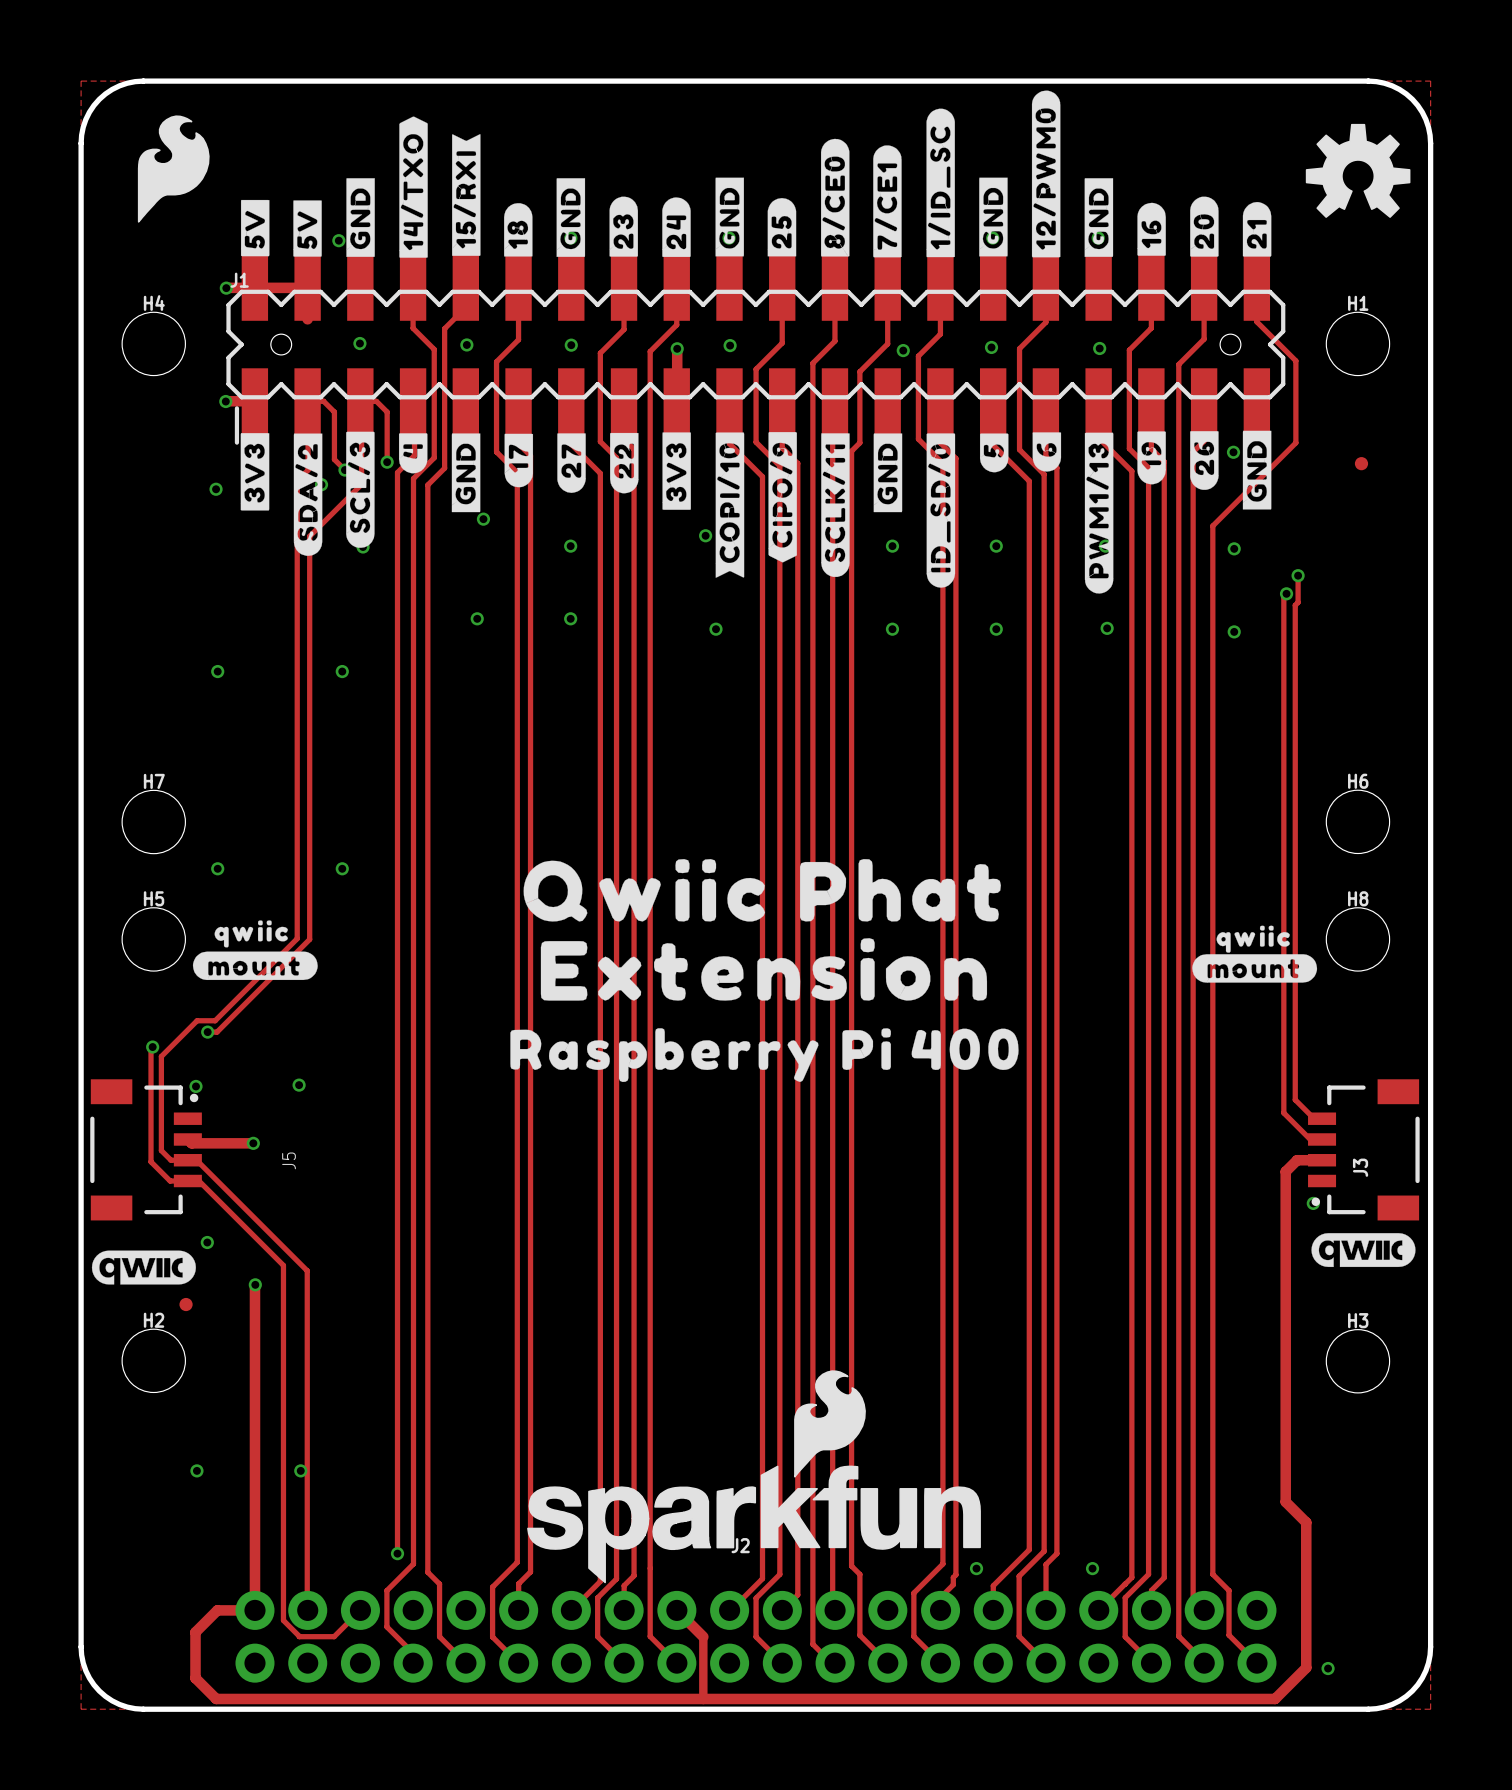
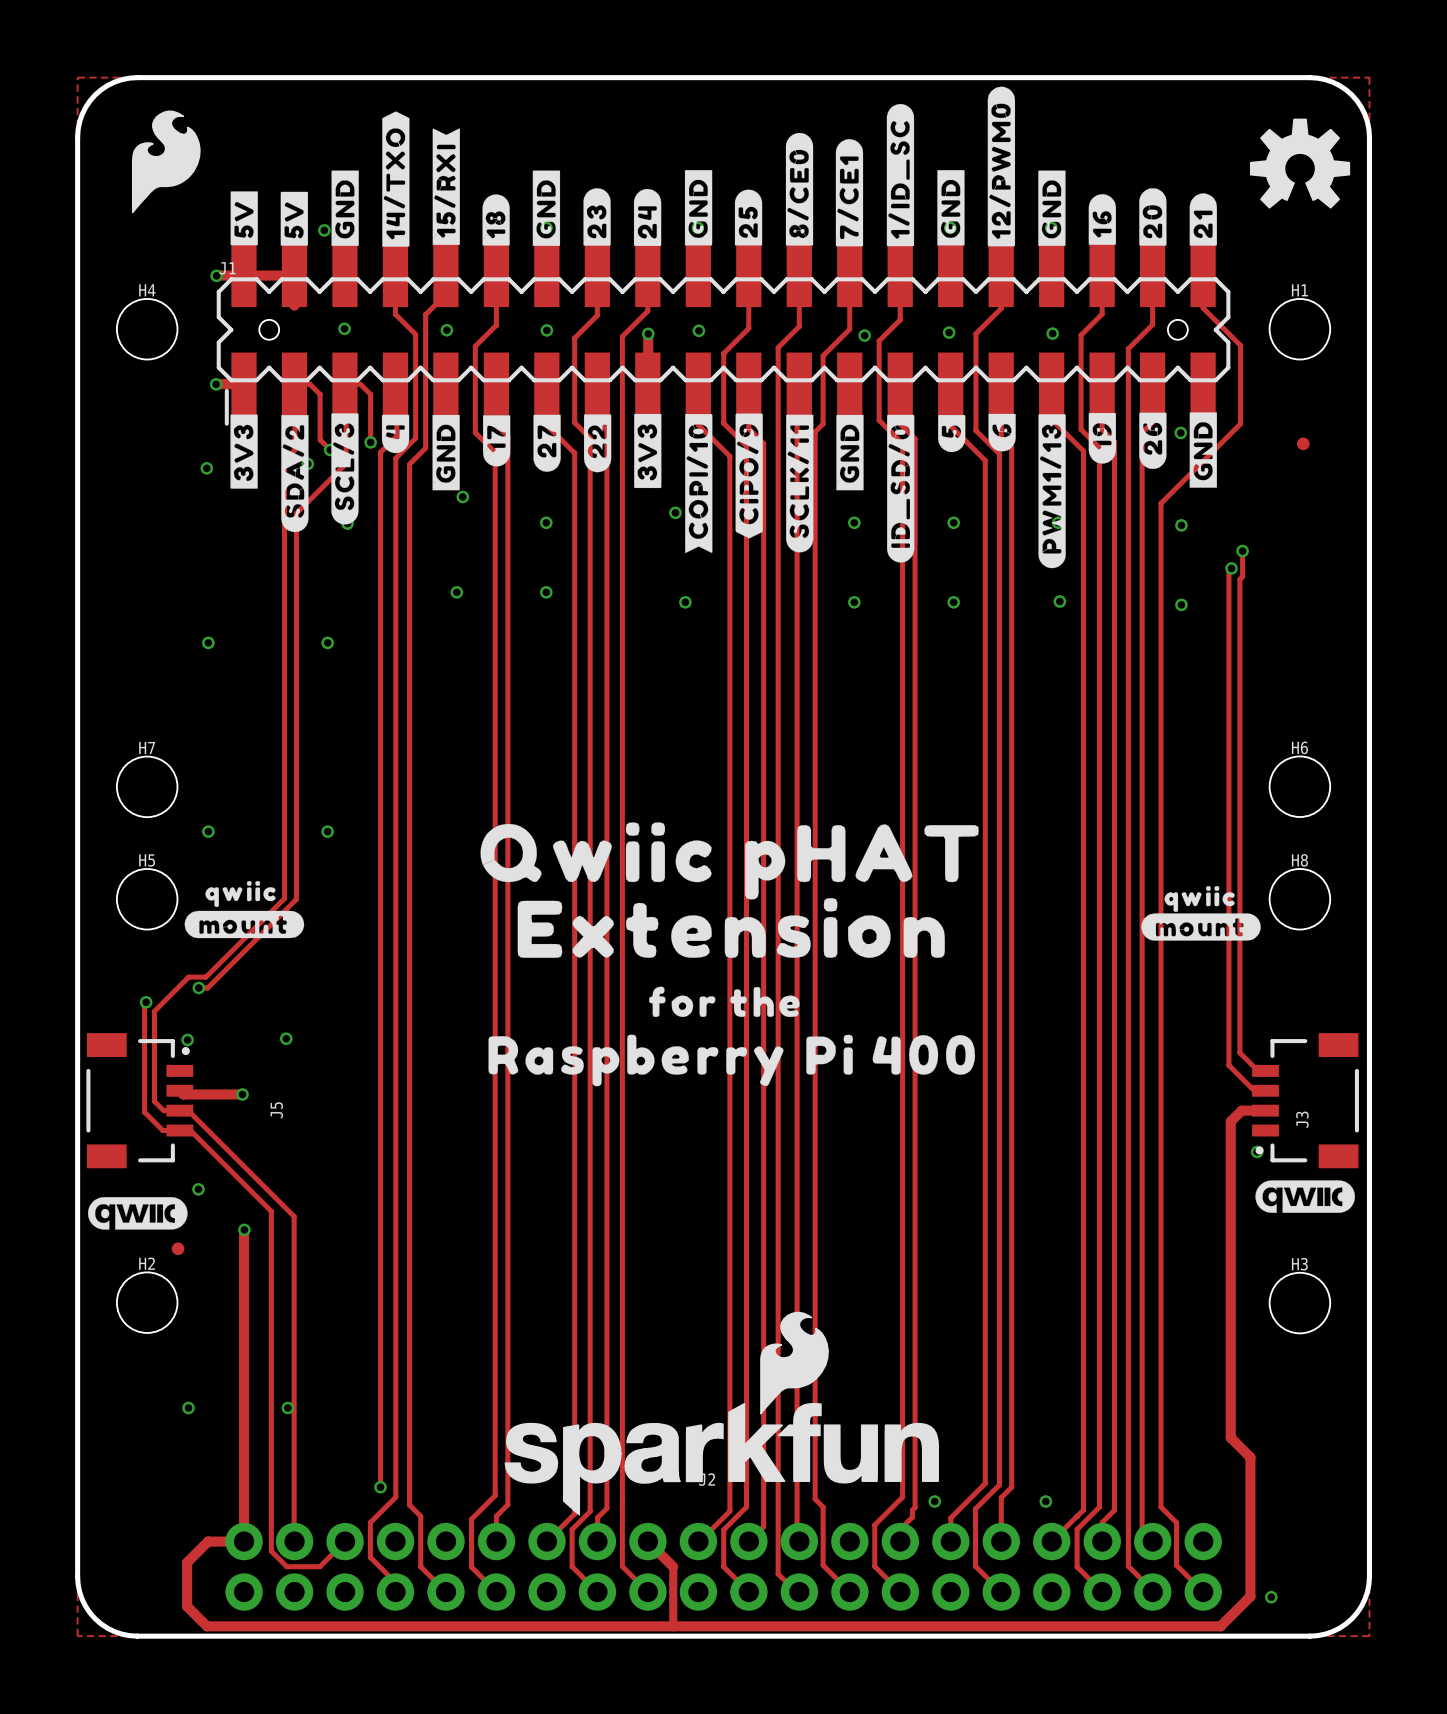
drawing shape: [523, 859, 1001, 922] -> [480, 822, 979, 900]
drawing: none -> [649, 986, 800, 1017]
drawing position: (764, 1055) -> (731, 1060)

